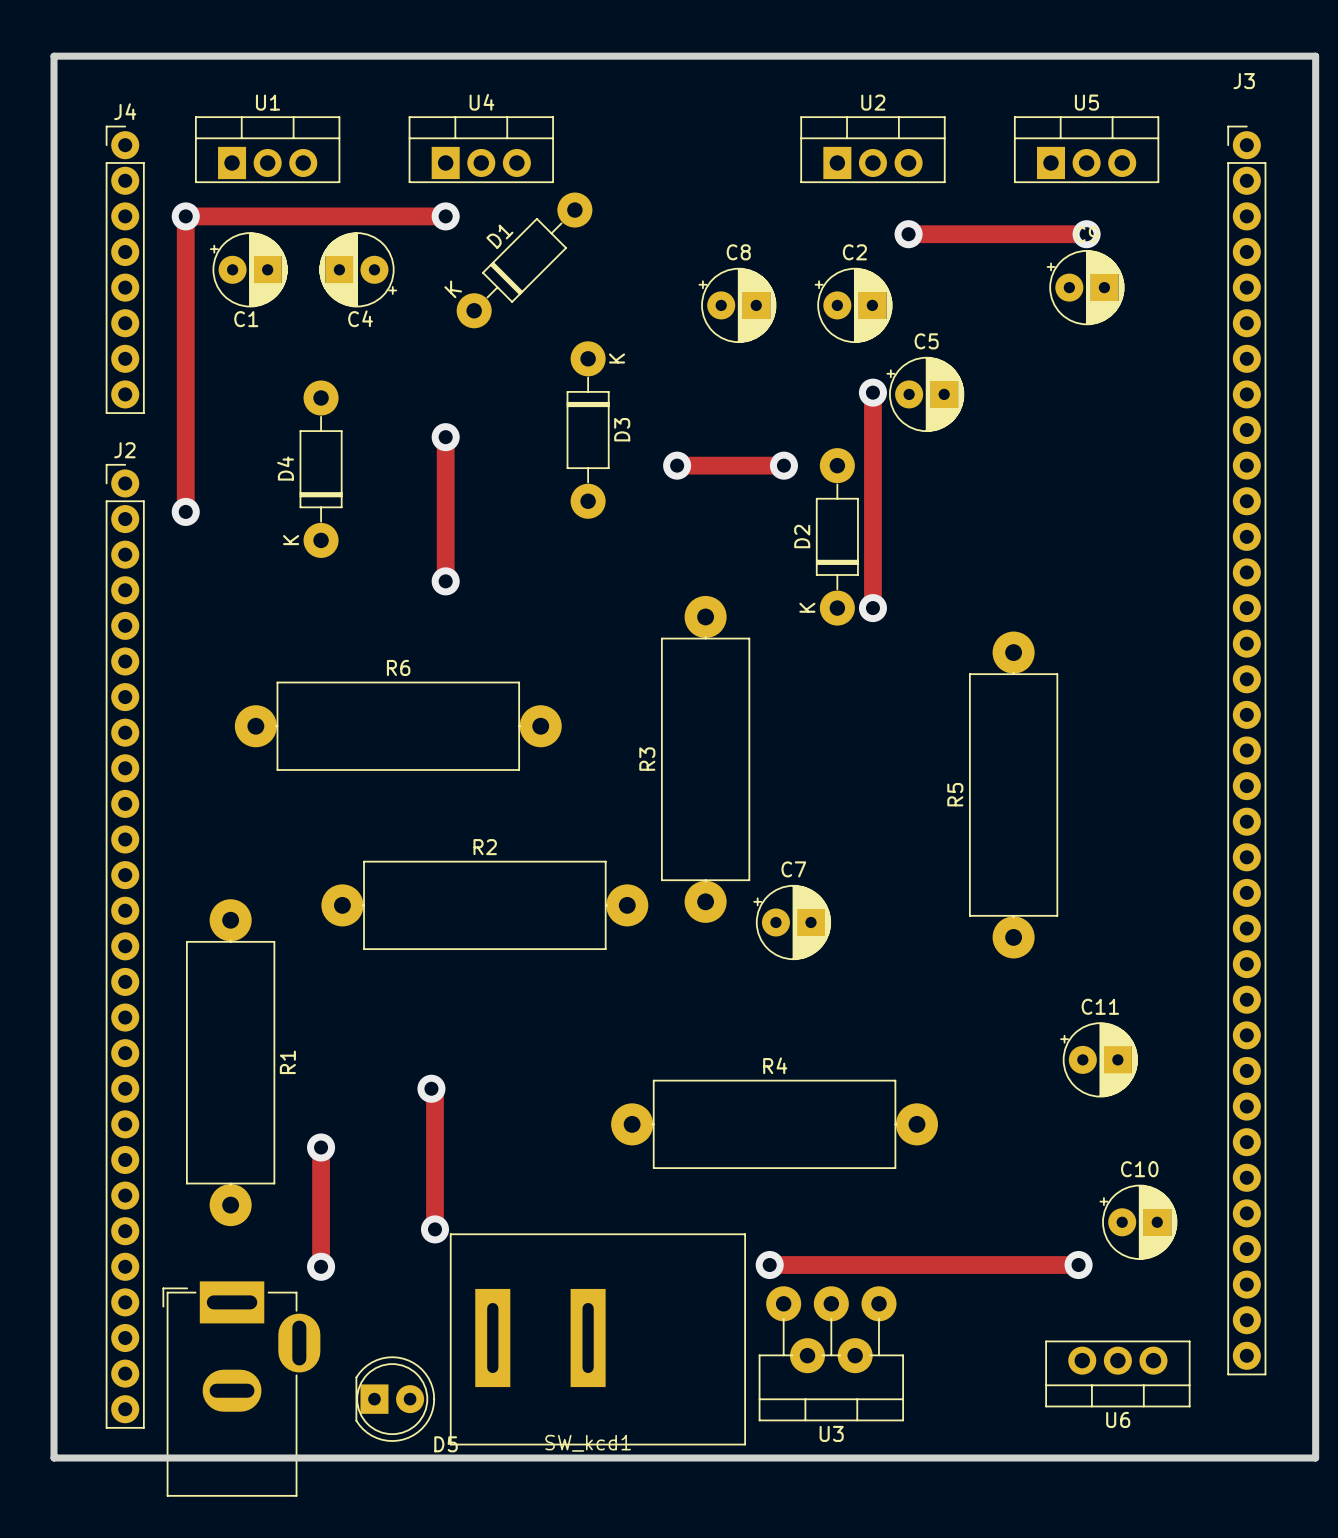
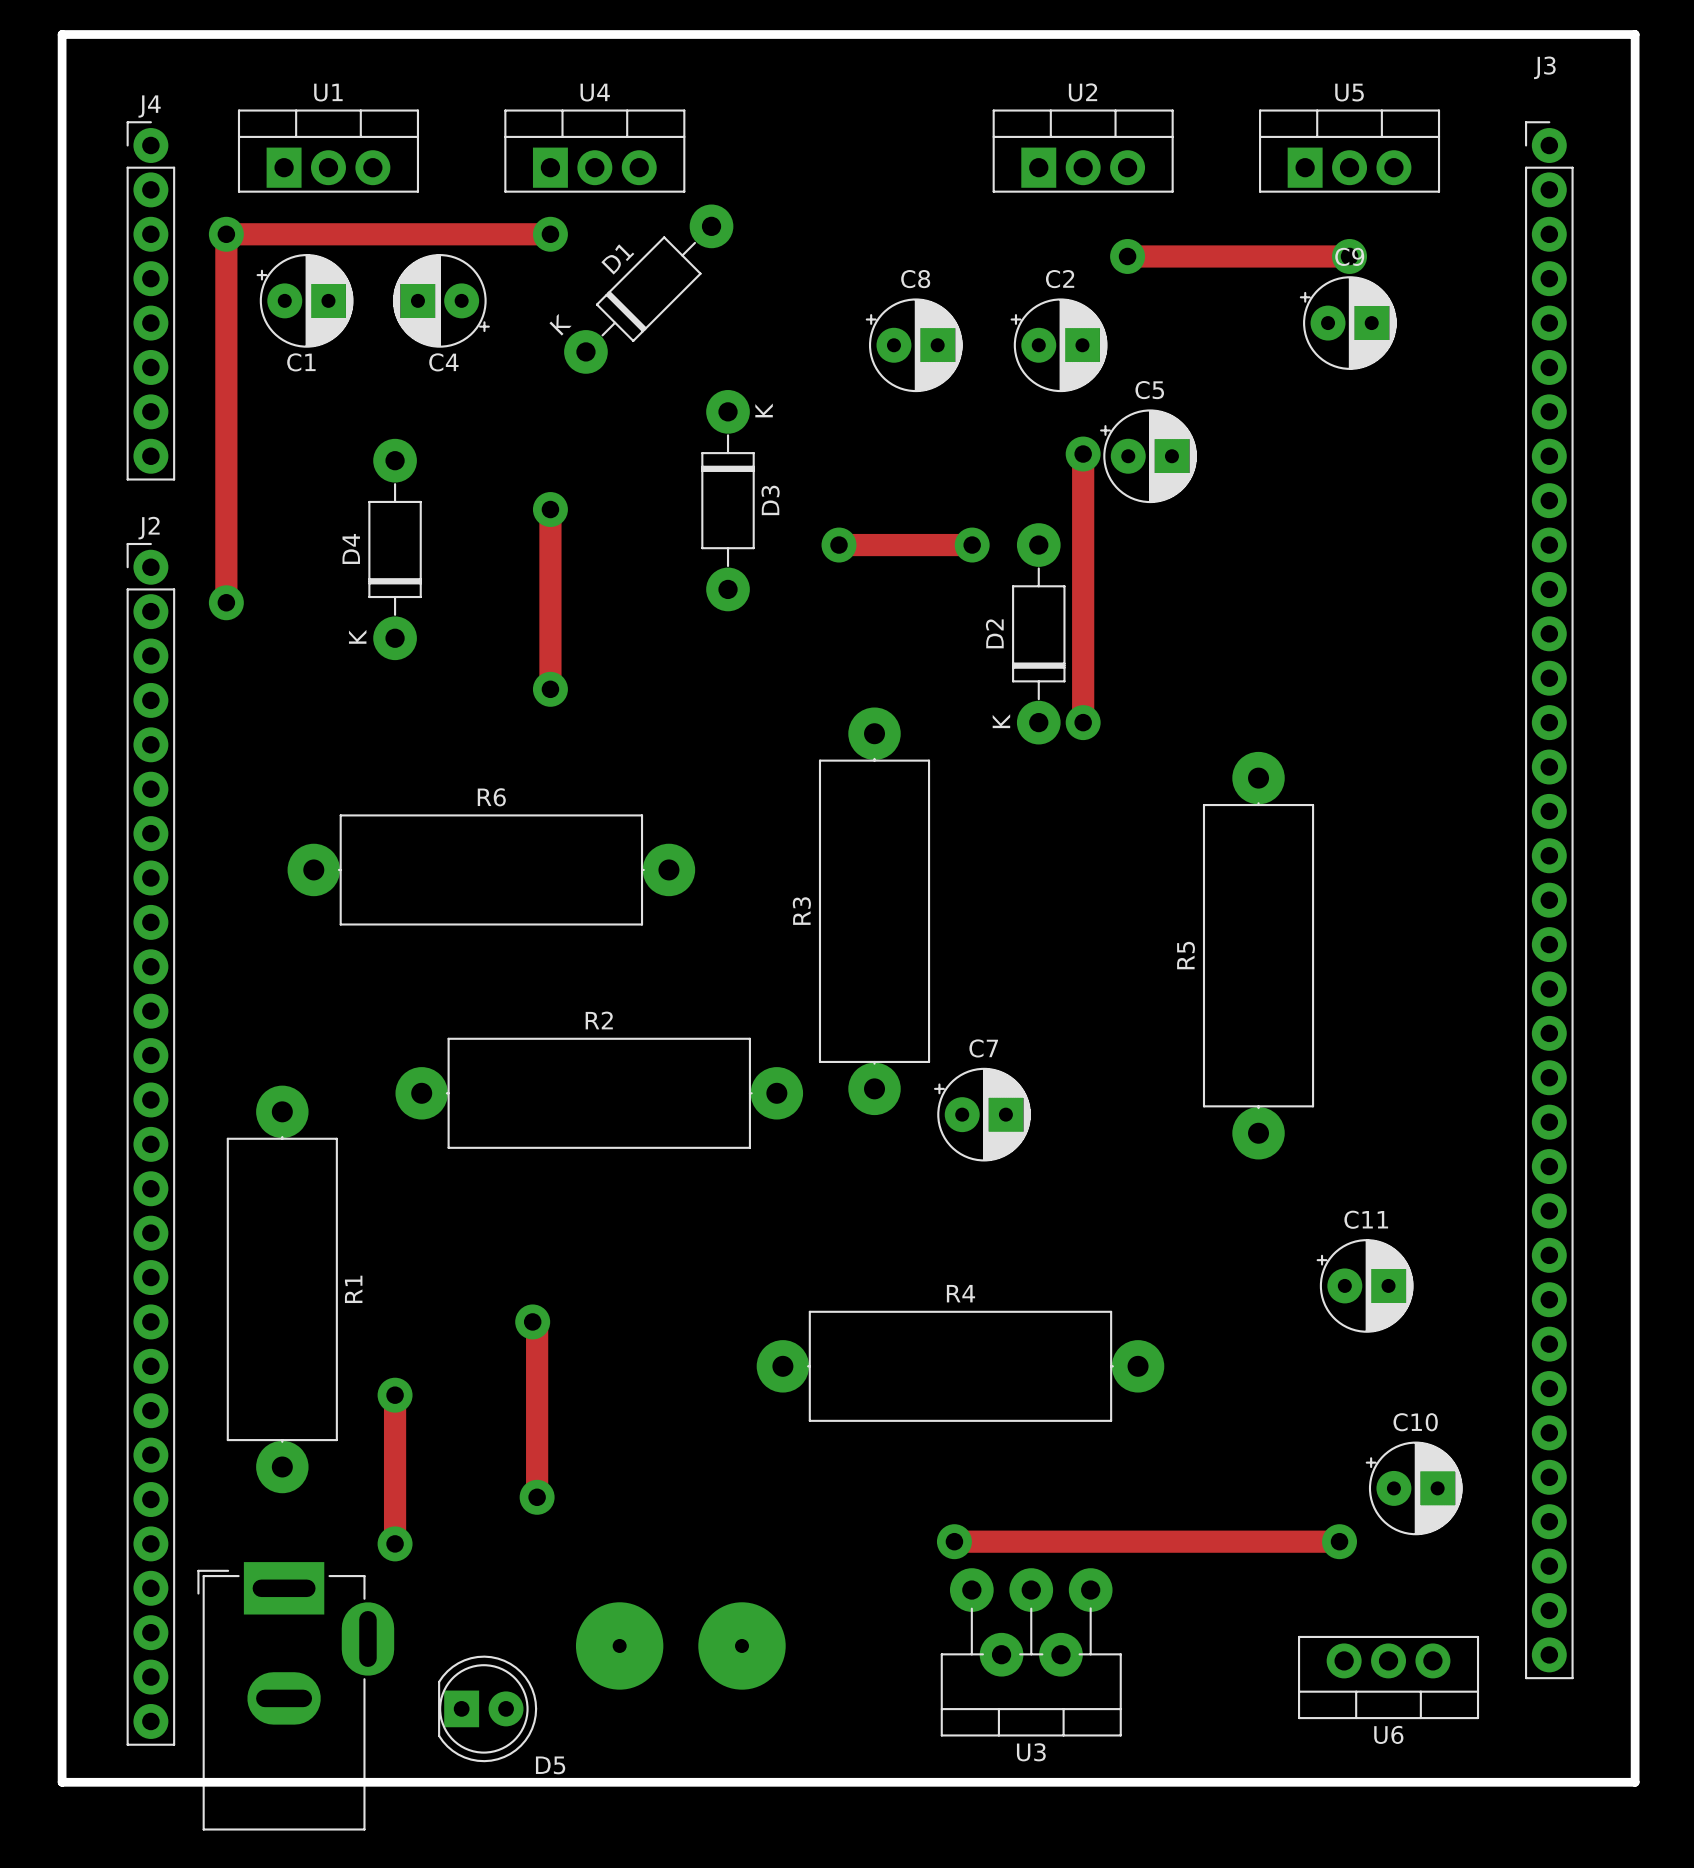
SW_kcd1: (597, 1339) -> none
via: none -> (619, 1645)
via: none -> (742, 1645)

